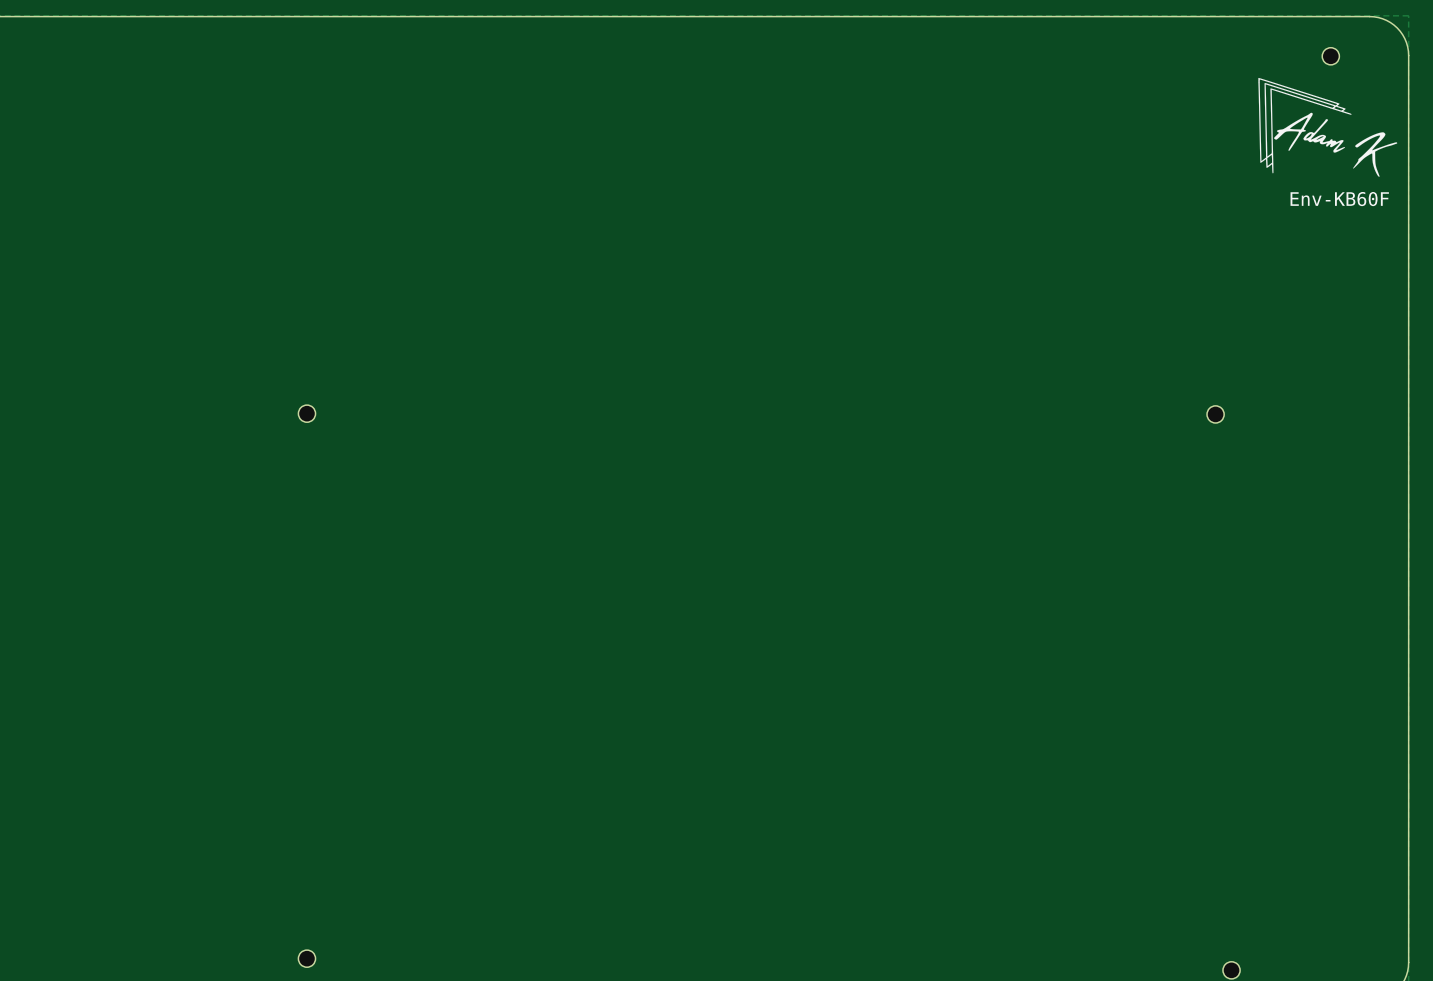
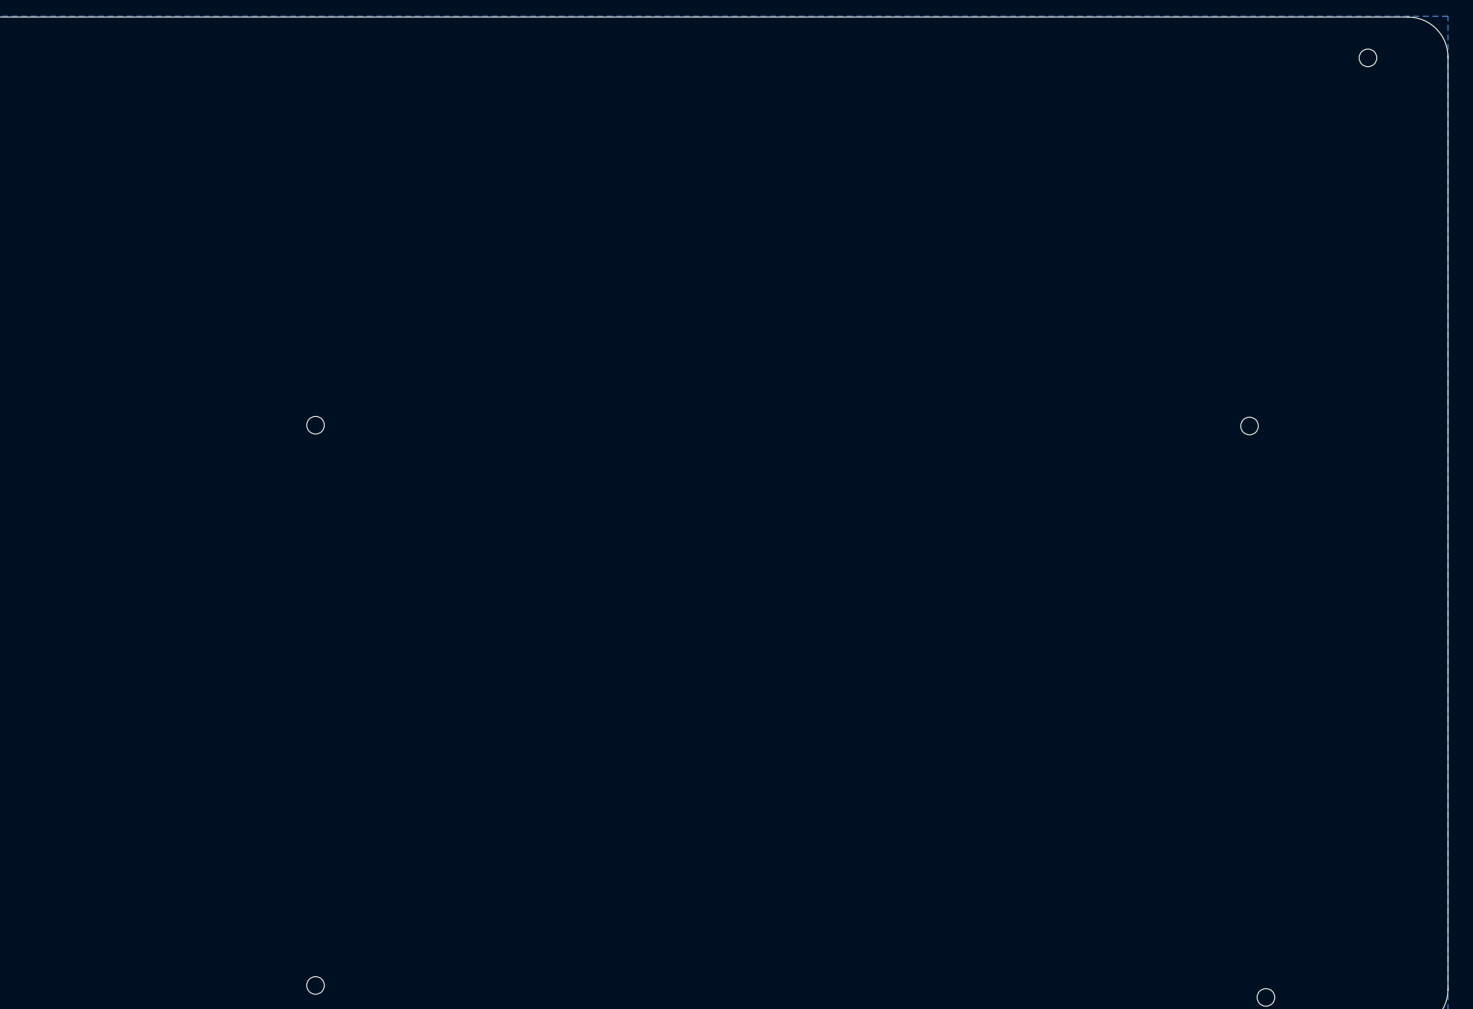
drawing: [1258, 77, 1398, 177] -> none
text: Env-KB60F (1339, 199) -> none

